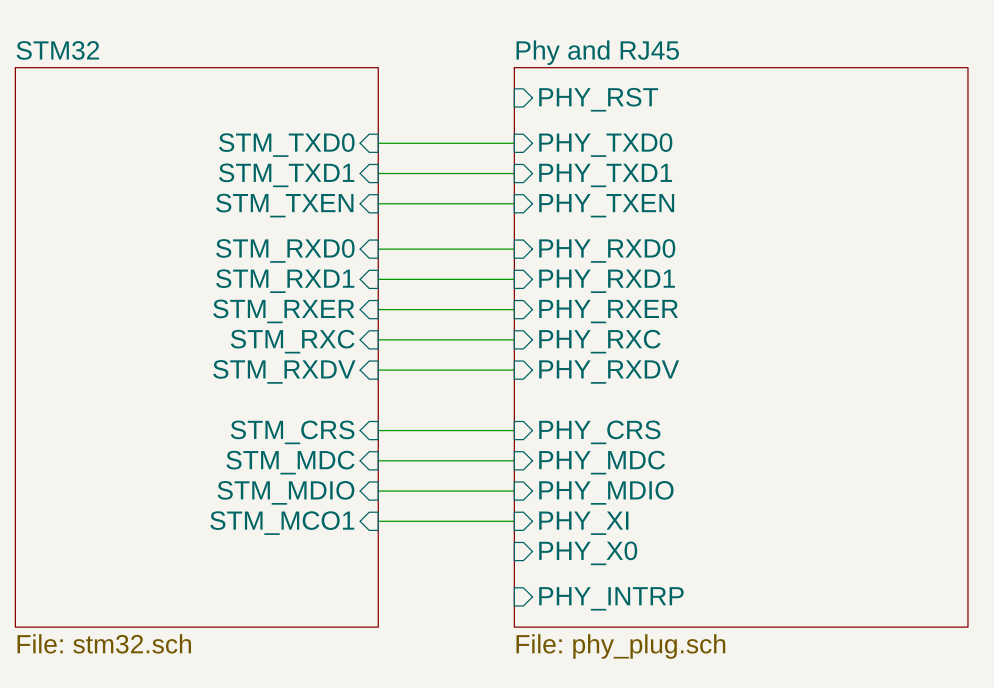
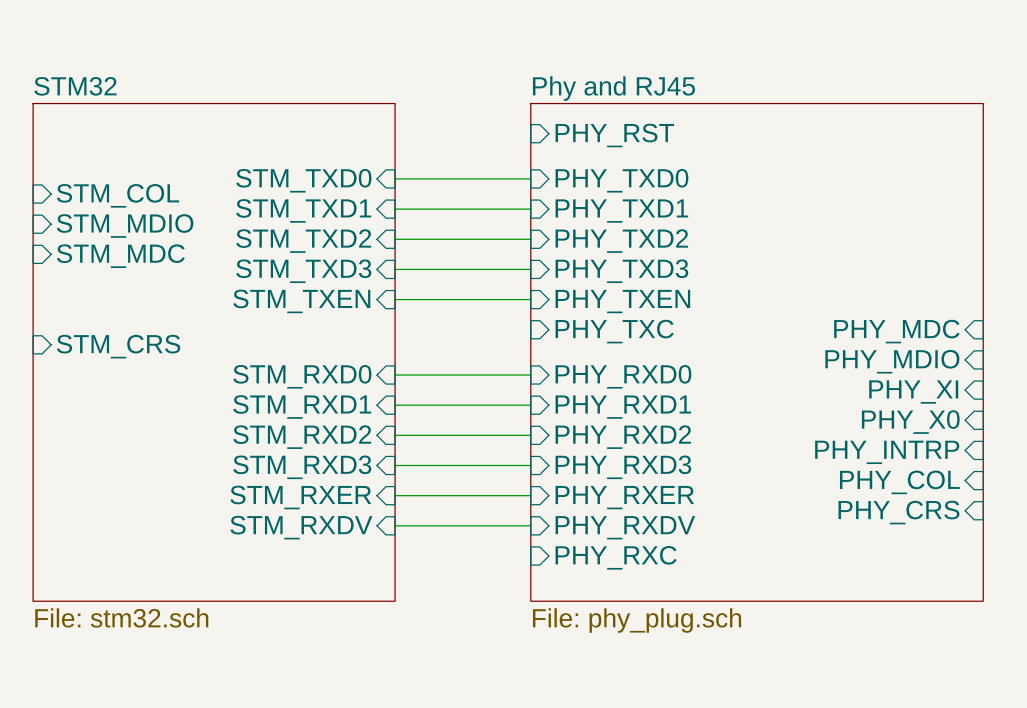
sheet STM32 name position: STM32 (57, 50) -> STM32 (75, 86)
sheet Phy and RJ45 name position: Phy and RJ45 (597, 52) -> Phy and RJ45 (613, 88)
sheet STM32 shape: [15, 67, 379, 628] -> [33, 103, 396, 602]
sheet Phy and RJ45 shape: [514, 67, 968, 628] -> [530, 103, 984, 602]
sheet pin position: PHY_RST (598, 99) -> PHY_RST (614, 135)
wire: (378, 143) (514, 143) -> none
sheet pin: STM_TXD0 (286, 145) -> none
sheet pin: PHY_TXD0 (605, 145) -> none
sheet pin: STM_TXD1 (286, 175) -> STM_TXD0 (303, 180)
sheet pin: PHY_TXD1 (605, 175) -> PHY_TXD0 (621, 180)
sheet pin: none -> STM_COL (118, 195)
sheet pin: STM_TXEN (284, 205) -> STM_TXD1 (303, 210)
sheet pin: PHY_TXEN (606, 205) -> PHY_TXD1 (621, 211)
sheet pin: none -> STM_MDIO (125, 225)
sheet pin: none -> STM_TXD2 (303, 241)
sheet pin: none -> PHY_TXD2 (621, 241)
wire: (378, 249) (514, 249) -> (395, 239) (530, 239)
sheet pin: none -> STM_MDC (120, 256)
sheet pin: STM_RXD0 (285, 250) -> none
sheet pin: PHY_RXD0 (607, 250) -> none
sheet pin: none -> STM_TXD3 (303, 271)
sheet pin: none -> PHY_TXD3 (621, 271)
wire: (378, 279) (514, 279) -> (395, 269) (530, 269)
sheet pin position: STM_RXD1 (285, 281) -> STM_RXD1 (302, 406)
sheet pin position: PHY_RXD1 (607, 281) -> PHY_RXD1 (623, 407)
sheet pin: none -> PHY_TXEN (622, 301)
wire: (378, 309) (514, 309) -> (395, 299) (530, 299)
sheet pin: STM_RXER (283, 311) -> STM_TXEN (301, 301)
sheet pin: PHY_RXER (608, 311) -> none
sheet pin: none -> PHY_TXC (614, 331)
sheet pin: none -> PHY_MDC (896, 331)
wire: (378, 339) (514, 339) -> (395, 405) (530, 405)
sheet pin: none -> STM_CRS (118, 346)
sheet pin: STM_RXC (292, 341) -> none
sheet pin: PHY_RXC (599, 341) -> none
sheet pin: none -> PHY_MDIO (892, 361)
sheet pin: STM_RXDV (284, 371) -> STM_RXD0 (302, 376)
sheet pin: PHY_RXDV (609, 372) -> PHY_RXD0 (623, 376)
sheet pin: none -> PHY_XI (913, 392)
sheet pin: none -> PHY_X0 (910, 422)
sheet pin: STM_CRS (292, 432) -> STM_RXD2 (302, 437)
sheet pin: PHY_CRS (599, 432) -> PHY_RXD2 (623, 437)
sheet pin: none -> PHY_INTRP (887, 452)
sheet pin: STM_MDC (290, 462) -> STM_RXD3 (302, 467)
sheet pin: PHY_MDC (602, 462) -> PHY_RXD3 (623, 467)
sheet pin: none -> PHY_COL (899, 482)
sheet pin: STM_MDIO (285, 492) -> STM_RXER (300, 497)
sheet pin: PHY_MDIO (606, 492) -> PHY_RXER (624, 497)
sheet pin: none -> PHY_CRS (898, 512)
sheet pin: STM_MCO1 (282, 523) -> STM_RXDV (301, 527)
sheet pin: PHY_XI (583, 523) -> PHY_RXDV (625, 527)
sheet pin: PHY_X0 (588, 553) -> PHY_RXC (616, 557)
sheet pin: PHY_INTRP (611, 598) -> none
sheet STM32 value position: File: stm32.sch (104, 643) -> File: stm32.sch (121, 617)
sheet Phy and RJ45 value position: File: phy_plug.sch (620, 646) -> File: phy_plug.sch (637, 620)

